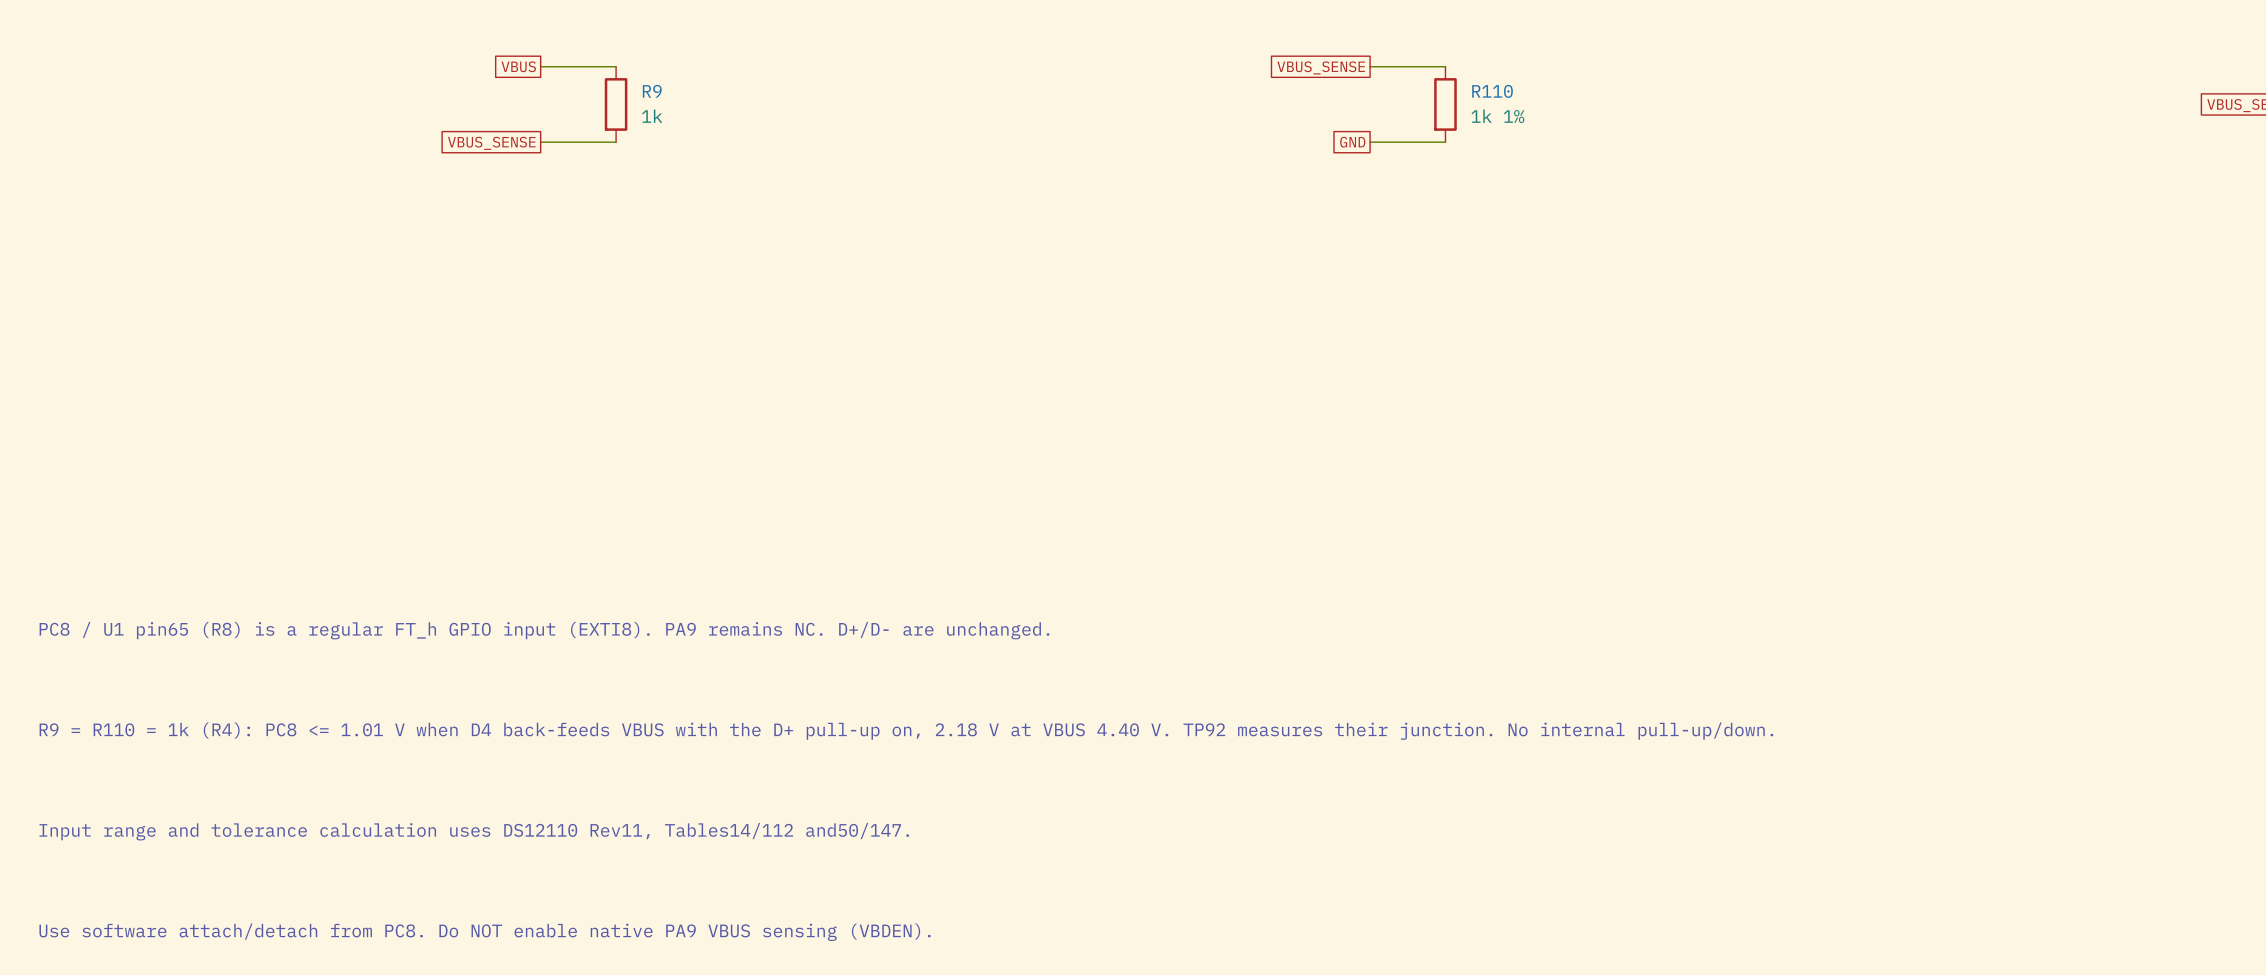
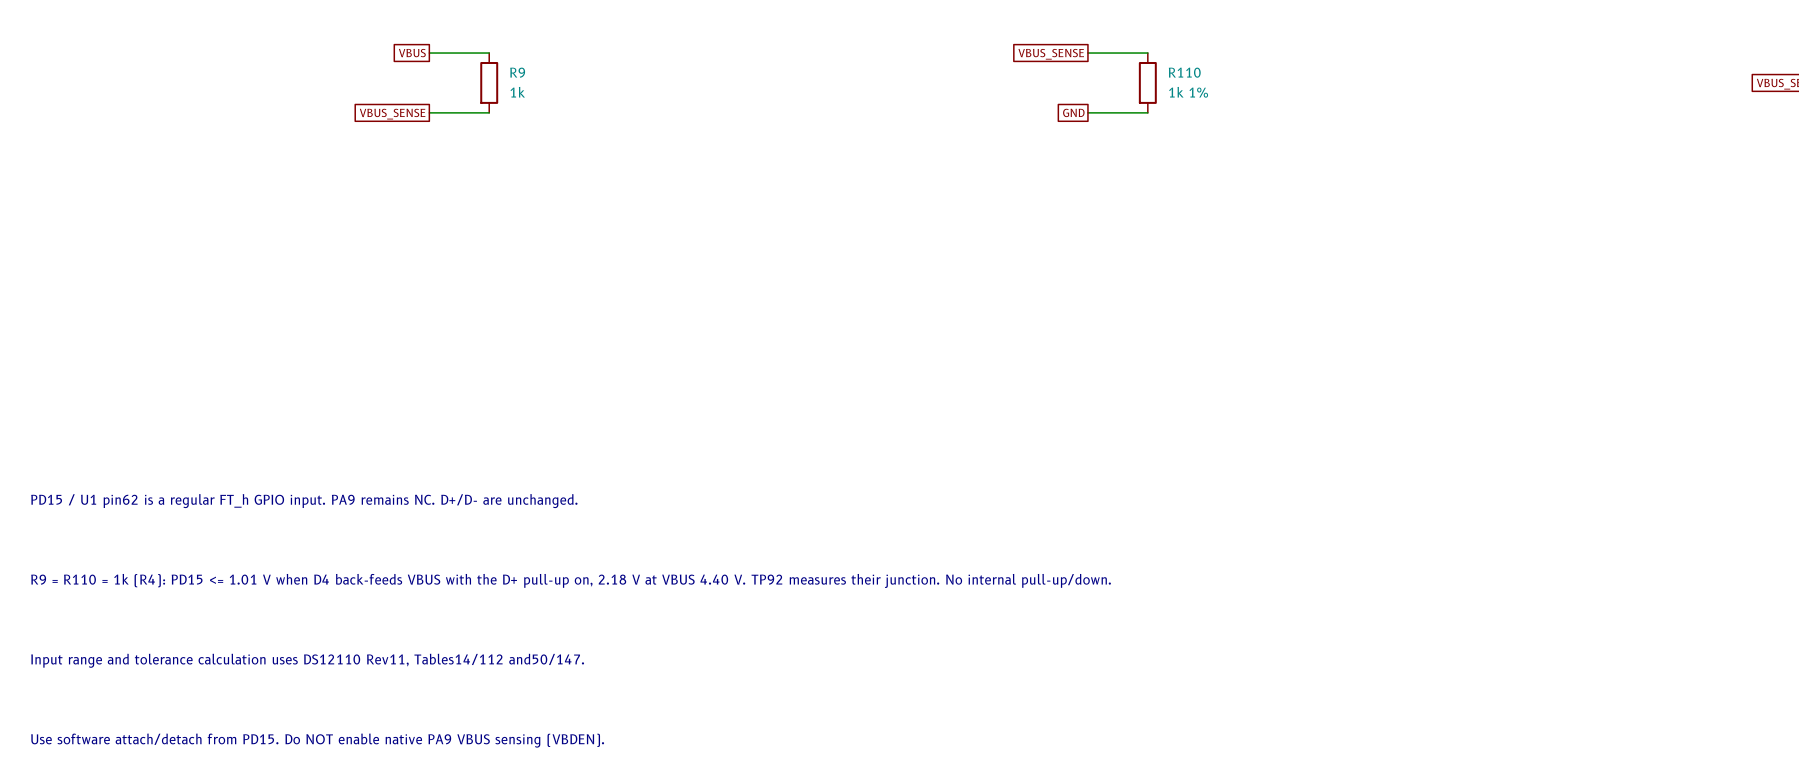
text: PC8 / U1 pin65 (R8) is a regular FT_h GPIO input (EXTI8). PA9 remains NC. D+/D- are unchanged. (544, 630) -> PD15 / U1 pin62 is a regular FT_h GPIO input. PA9 remains NC. D+/D- are unchanged. (304, 501)
text: R9 = R110 = 1k (R4): PC8 <= 1.01 V when D4 back-feeds VBUS with the D+ pull-up on, 2.18 V at VBUS 4.40 V. TP92 measures their junction. No internal pull-up/down. (906, 731) -> R9 = R110 = 1k (R4): PD15 <= 1.01 V when D4 back-feeds VBUS with the D+ pull-up on, 2.18 V at VBUS 4.40 V. TP92 measures their junction. No internal pull-up/down. (571, 580)
text: Use software attach/detach from PC8. Do NOT enable native PA9 VBUS sensing (VBDEN). (485, 932) -> Use software attach/detach from PD15. Do NOT enable native PA9 VBUS sensing (VBDEN). (317, 740)

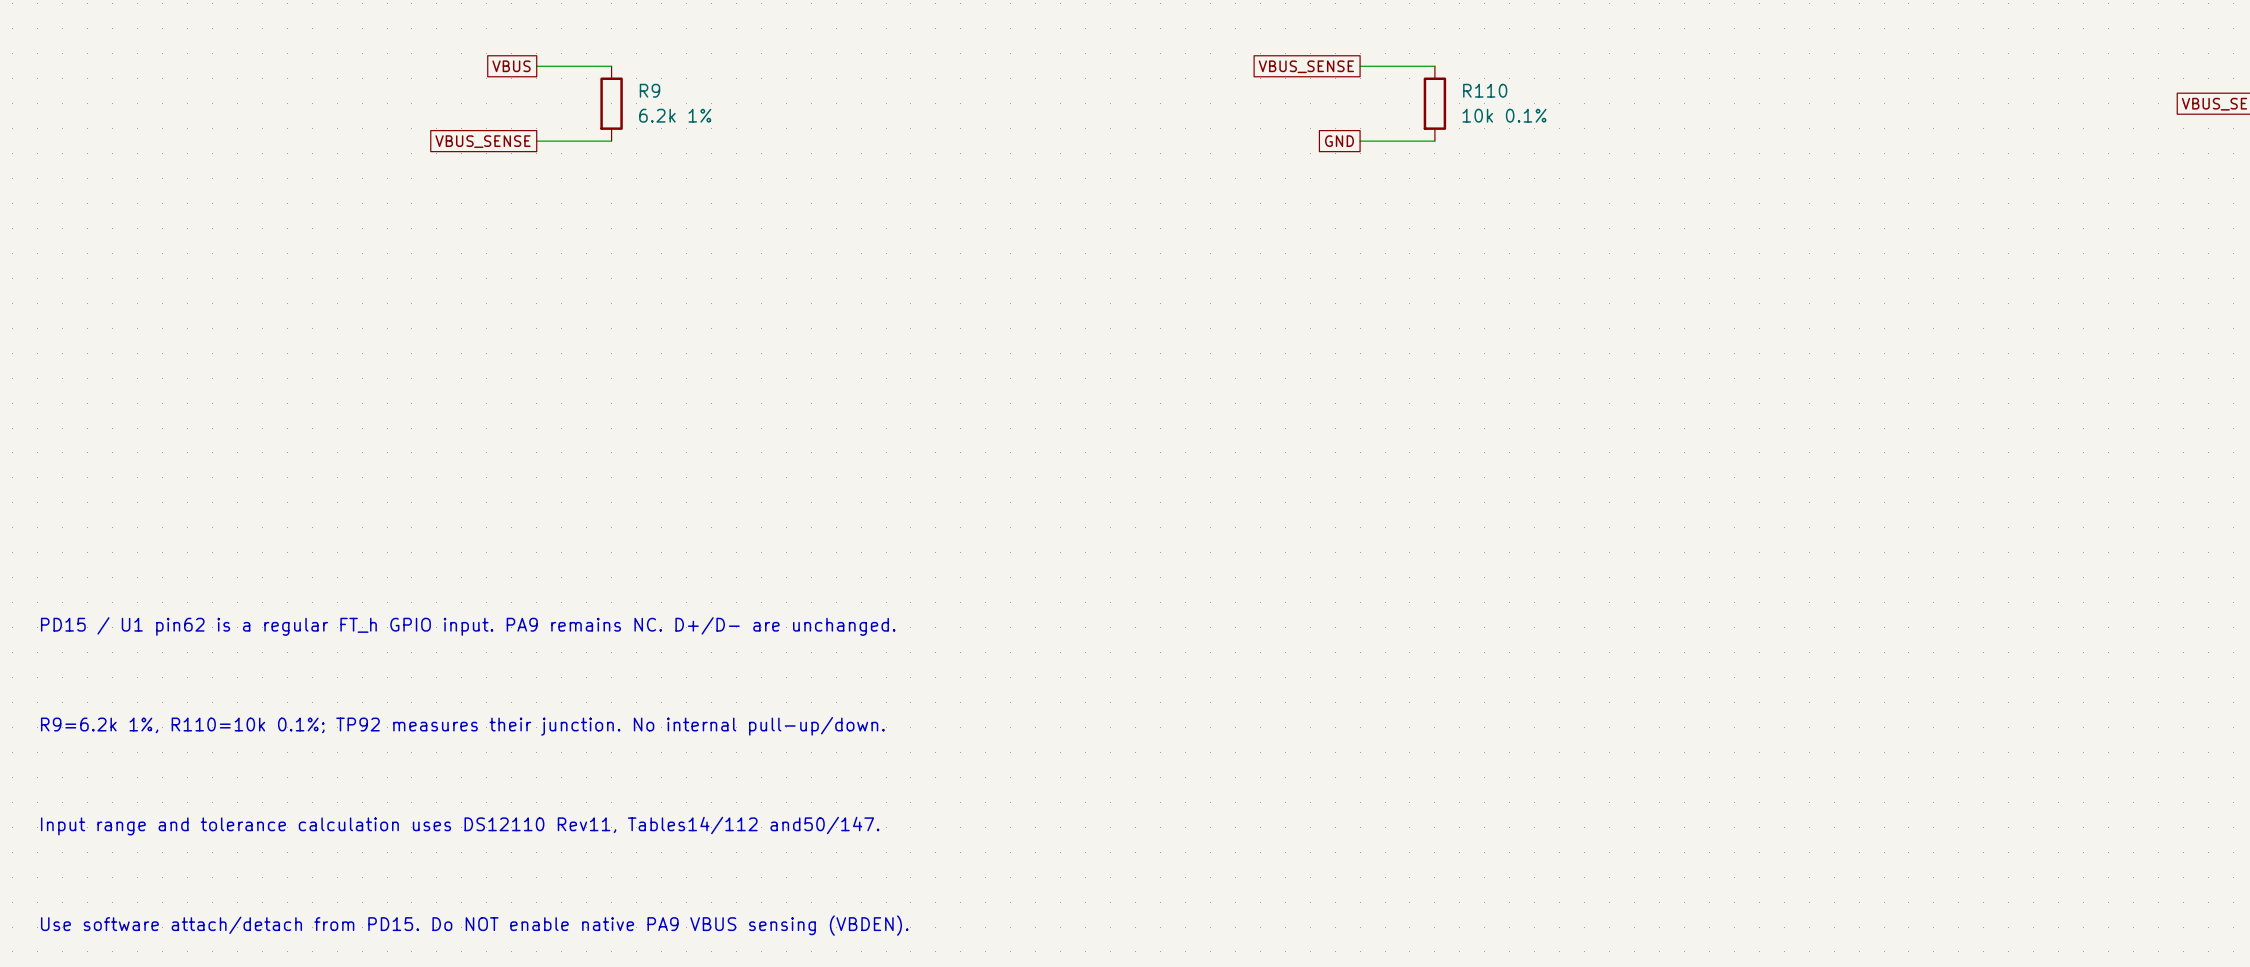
R9 value: 1k (517, 92) -> 6.2k 1% (675, 115)
R110 value: 1k 1% (1188, 92) -> 10k 0.1% (1504, 115)
text: R9 = R110 = 1k (R4): PD15 <= 1.01 V when D4 back-feeds VBUS with the D+ pull-up on, 2.18 V at VBUS 4.40 V. TP92 measures their junction. No internal pull-up/down. (571, 580) -> R9=6.2k 1%, R110=10k 0.1%; TP92 measures their junction. No internal pull-up/down. (462, 726)

